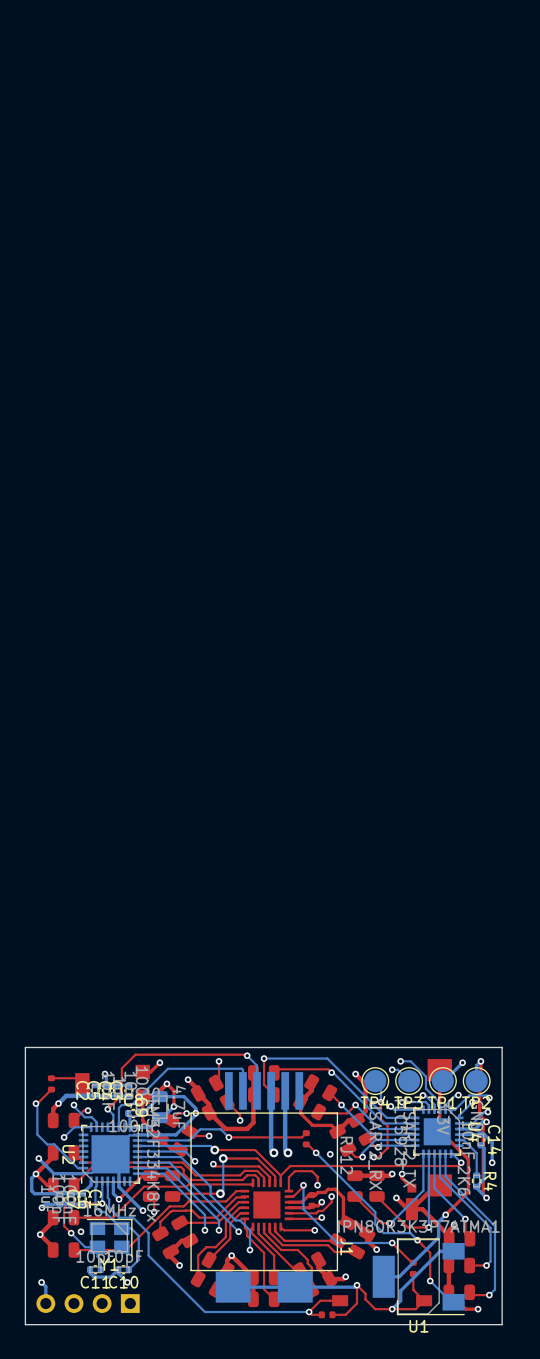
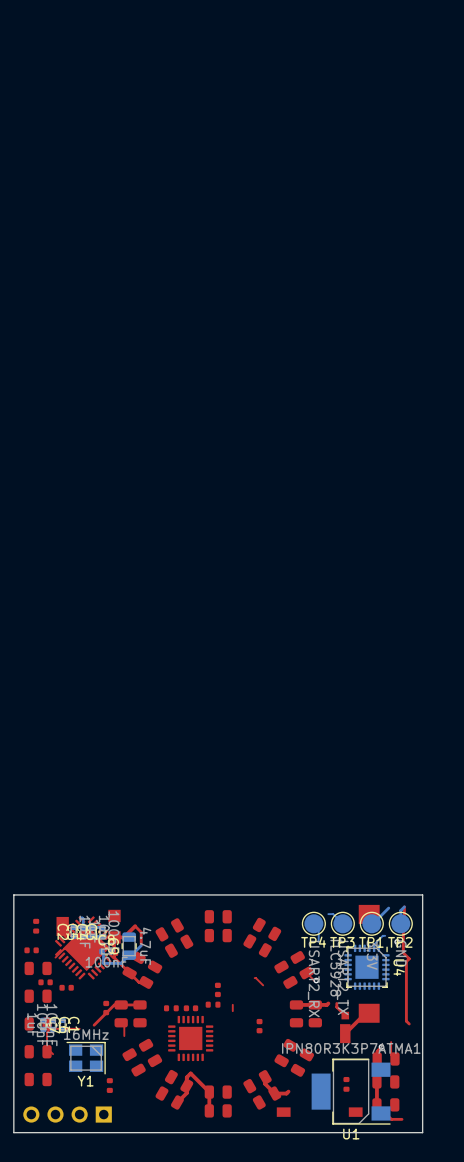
bottom track: (247, 1055) (257, 1065) (257, 1090) -> none
top track: (247, 1055) (135, 1054) (121, 1068) (121, 1095) (107, 1109) -> none
via: (247, 1055) -> none
bottom track: (264, 1058) (327, 1058) (386, 1117) (415, 1117) -> none
top track: (264, 1058) (264, 1084) (274, 1094) -> none
via: (264, 1058) -> none
top track: (219, 1061) (219, 1080) (216, 1083) -> none
via: (219, 1061) -> none
bottom track: (400, 1061) (410, 1061) (426, 1076) (426, 1088) (440, 1102) (440, 1109) -> none
via: (400, 1061) -> none
via: (480, 1061) -> none
top track: (159, 1062) (150, 1071) (142, 1071) -> none
via: (159, 1062) -> none
via: (462, 1062) -> none
via: (392, 1069) -> none
top track: (439, 1070) (439, 1130) (468, 1159) (468, 1192) (445, 1214) -> none
top track: (253, 1072) (253, 1122) (247, 1128) (225, 1128) (209, 1112) (209, 1104) (188, 1079) -> none
bottom track: (331, 1072) (383, 1123) (415, 1123) -> none
top track: (331, 1072) (328, 1069) (277, 1069) (274, 1072) -> none
via: (331, 1072) -> none
via: (104, 1074) -> none
top track: (355, 1074) (365, 1083) (365, 1111) (356, 1120) (348, 1120) (337, 1131) (331, 1125) (312, 1125) (300, 1113) (300, 1101) (311, 1090) (311, 1082) -> none
via: (355, 1074) -> none
top track: (51, 1078) (76, 1078) (82, 1084) -> none
via: (188, 1079) -> none
via: (166, 1083) -> none
top track: (51, 1089) (35, 1103) -> none
bottom track: (242, 1090) (241, 1068) (167, 1068) (131, 1105) (121, 1105) (118, 1107) (118, 1127) -> none
bottom track: (271, 1090) (271, 1150) (273, 1152) -> none
bottom track: (285, 1090) (285, 1150) (288, 1152) -> none
top track: (329, 1092) (341, 1105) -> none
bottom track: (106, 1095) (66, 1095) (58, 1103) -> none
bottom track: (422, 1095) (425, 1095) (434, 1104) (434, 1109) -> none
via: (422, 1095) -> none
via: (458, 1095) -> none
bottom track: (489, 1097) (486, 1095) (469, 1095) (455, 1109) (451, 1109) -> none
via: (489, 1097) -> none
top track: (227, 1102) (240, 1115) (240, 1120) -> none
top track: (380, 1102) (380, 1119) (387, 1125) (387, 1148) (378, 1157) (373, 1157) -> none
via: (380, 1102) -> none
bottom track: (402, 1102) (425, 1102) (428, 1105) (428, 1109) -> none
via: (402, 1102) -> none
bottom track: (472, 1102) (459, 1115) (459, 1117) -> none
bottom track: (35, 1103) (37, 1134) (47, 1144) (54, 1144) (77, 1168) (83, 1168) -> none
via: (35, 1103) -> none
top track: (58, 1103) (53, 1108) (53, 1120) -> none
via: (58, 1103) -> none
bottom track: (73, 1105) (84, 1117) (91, 1117) (96, 1122) (96, 1127) -> none
via: (73, 1105) -> none
bottom track: (341, 1105) (371, 1134) (415, 1134) -> none
via: (341, 1105) -> none
bottom track: (355, 1105) (379, 1128) (415, 1128) -> none
top track: (355, 1105) (347, 1113) (318, 1112) -> none
via: (355, 1105) -> none
via: (173, 1106) -> none
bottom track: (390, 1106) (394, 1109) (423, 1109) -> none
via: (390, 1106) -> none
bottom track: (107, 1109) (113, 1114) (113, 1127) -> none
via: (107, 1109) -> none
via: (88, 1110) -> none
part: none -> (31, 950)
bottom track: (487, 1112) (484, 1112) (473, 1123) (459, 1123) -> none
via: (487, 1112) -> none
bottom track: (138, 1113) (143, 1113) (159, 1096) (183, 1096) (195, 1108) (195, 1114) (175, 1134) (129, 1135) (92, 1172) (53, 1173) (38, 1158) -> none
top track: (186, 1113) (177, 1113) (170, 1120) -> none
via: (186, 1113) -> none
via: (195, 1113) -> none
part position: (63, 1120) -> (38, 968)
via: (240, 1120) -> none
bottom track: (486, 1121) (482, 1121) (475, 1128) (459, 1128) -> none
via: (486, 1121) -> none
bottom track: (91, 1127) (74, 1127) (64, 1137) -> none
top track: (190, 1131) (194, 1135) (209, 1135) -> none
top track: (306, 1133) (302, 1137) (228, 1137) -> none
bottom track: (459, 1134) (484, 1134) (492, 1142) (492, 1162) -> none
via: (209, 1135) -> none
via: (64, 1137) -> none
bottom track: (228, 1137) (220, 1129) (200, 1129) (189, 1140) (137, 1140) -> none
via: (228, 1137) -> none
part rotation: 0° (306, 1138) -> 90° clockwise (171, 1008)
part position: (306, 1138) -> (171, 1008)
C14 side: bottom (480, 1139) -> top (217, 989)
bottom track: (415, 1140) (375, 1140) (362, 1152) (362, 1157) -> none
bottom track: (459, 1140) (463, 1140) (476, 1153) (476, 1175) -> none
part footprint: [47, 1145, 80, 1161] -> [38, 979, 53, 986]
bottom track: (137, 1145) (210, 1145) (214, 1150) -> none
bottom track: (415, 1145) (379, 1145) (378, 1147) -> none
bottom track: (480, 1145) (484, 1148) (484, 1179) (476, 1188) (486, 1197) -> none
top track: (348, 1149) (355, 1157) (362, 1157) -> none
top track: (214, 1150) (255, 1150) (280, 1175) (290, 1166) (457, 1166) (461, 1162) -> none
via: (214, 1150) -> none
bottom track: (137, 1151) (185, 1151) (195, 1161) -> none
top track: (53, 1152) (53, 1156) (35, 1174) (47, 1185) (53, 1185) -> none
top track: (73, 1152) (83, 1162) (182, 1162) (195, 1175) (240, 1175) (244, 1170) (257, 1170) (264, 1177) (264, 1182) -> none
via: (273, 1152) -> none
via: (288, 1152) -> none
bottom track: (316, 1152) (375, 1212) (375, 1224) (383, 1233) (410, 1233) (417, 1240) -> none
via: (316, 1152) -> none
bottom track: (423, 1153) (423, 1190) (389, 1223) -> none
bottom track: (428, 1153) (428, 1227) -> none
bottom track: (434, 1153) (434, 1188) (465, 1219) -> none
bottom track: (440, 1153) (440, 1177) (490, 1227) (490, 1261) (486, 1265) -> none
bottom track: (445, 1153) (445, 1176) (494, 1226) (494, 1289) (489, 1295) -> none
bottom track: (451, 1153) (461, 1162) -> none
bottom track: (110, 1154) (118, 1162) (118, 1187) (142, 1210) -> none
U2 side: bottom (110, 1154) -> top (86, 947)
via: (330, 1154) -> none
bottom track: (137, 1157) (180, 1157) (210, 1186) (210, 1195) (235, 1220) (240, 1220) (249, 1230) (249, 1250) -> none
via: (362, 1157) -> none
via: (373, 1157) -> none
via: (38, 1158) -> none
bottom track: (223, 1158) (223, 1190) (220, 1193) -> none
top track: (223, 1158) (257, 1158) (275, 1176) (275, 1182) -> none
via: (223, 1158) -> none
via: (195, 1161) -> none
bottom track: (137, 1162) (169, 1162) (238, 1231) -> none
via: (461, 1162) -> none
via: (492, 1162) -> none
top track: (213, 1164) (215, 1166) (259, 1166) (269, 1177) (269, 1182) -> none
via: (213, 1164) -> none
part: none -> (38, 996)
bottom track: (137, 1168) (166, 1168) (219, 1220) (219, 1230) -> none
bottom track: (137, 1173) (163, 1173) (204, 1214) (204, 1230) -> none
bottom track: (35, 1174) (31, 1178) (31, 1190) (34, 1193) (82, 1193) (91, 1184) (91, 1181) -> none
via: (35, 1174) -> none
via: (392, 1174) -> none
via: (402, 1174) -> none
bottom track: (96, 1181) (95, 1206) (100, 1212) (104, 1212) (121, 1228) (131, 1228) (138, 1235) (138, 1259) (128, 1269) -> none
bottom track: (102, 1181) (102, 1203) -> none
bottom track: (107, 1181) (109, 1207) (119, 1217) (133, 1217) (148, 1233) (148, 1255) (204, 1311) (309, 1311) -> none
bottom track: (113, 1181) (113, 1193) (119, 1199) -> none
R4 side: bottom (476, 1181) -> top (213, 1004)
top track: (253, 1182) (144, 1186) (113, 1217) (73, 1217) -> none
top track: (258, 1182) (258, 1178) (255, 1175) (247, 1175) (242, 1180) (189, 1180) (183, 1173) (183, 1169) (181, 1167) (92, 1167) (73, 1185) -> none
part: (63, 1185) -> none
bottom track: (303, 1185) (303, 1209) (337, 1242) (392, 1242) -> none
top track: (303, 1185) (293, 1196) (288, 1196) -> none
via: (303, 1185) -> none
top track: (317, 1185) (317, 1176) (311, 1171) (295, 1171) (288, 1177) (288, 1191) -> none
via: (317, 1185) -> none
J1: RJ12 (264, 1187) -> none
top track: (244, 1191) (236, 1191) (226, 1201) (188, 1201) (183, 1206) (169, 1206) (126, 1250) (73, 1250) -> none
top track: (220, 1193) (175, 1193) (172, 1196) -> none
via: (220, 1193) -> none
top track: (244, 1196) (236, 1197) (216, 1217) (199, 1217) (192, 1210) (172, 1210) (160, 1221) (160, 1233) -> none
top track: (331, 1196) (331, 1202) (322, 1210) (316, 1213) (288, 1213) -> none
via: (331, 1196) -> none
top track: (355, 1196) (381, 1223) (389, 1223) -> none
top track: (377, 1196) (408, 1227) (428, 1227) -> none
part: none -> (38, 1023)
top track: (396, 1197) (407, 1209) (422, 1209) (449, 1235) (449, 1238) -> none
via: (396, 1197) -> none
via: (486, 1197) -> none
via: (119, 1199) -> none
top track: (244, 1202) (238, 1202) (218, 1222) (179, 1222) -> none
top track: (288, 1202) (302, 1202) (309, 1195) (325, 1192) (328, 1189) (335, 1189) (343, 1197) (343, 1218) (348, 1222) (355, 1222) (367, 1234) (367, 1240) (376, 1249) -> none
top track: (321, 1202) (318, 1205) (309, 1207) (288, 1207) -> none
via: (321, 1202) -> none
via: (102, 1203) -> none
bottom track: (82, 1204) (45, 1204) (41, 1207) -> none
part position: (266, 1204) -> (190, 1038)
via: (41, 1207) -> none
top track: (244, 1207) (239, 1207) (225, 1221) (225, 1236) (215, 1247) (206, 1247) (198, 1255) (198, 1279) -> none
via: (142, 1210) -> none
via: (154, 1212) -> none
top track: (244, 1213) (240, 1213) (230, 1223) (230, 1238) (209, 1259) -> none
bottom track: (445, 1214) (438, 1221) (438, 1237) (399, 1276) (383, 1276) -> none
via: (445, 1214) -> none
top track: (53, 1217) (53, 1221) (40, 1234) (53, 1247) (53, 1250) -> none
part: (63, 1217) -> none
top track: (321, 1217) (288, 1218) -> none
via: (321, 1217) -> none
top track: (244, 1218) (247, 1235) (264, 1252) (264, 1289) (274, 1299) -> none
via: (465, 1219) -> none
via: (389, 1223) -> none
top track: (253, 1227) (251, 1232) (274, 1255) (274, 1277) -> none
top track: (258, 1227) (258, 1233) (295, 1270) (300, 1270) -> none
top track: (264, 1227) (264, 1232) (281, 1250) (297, 1250) (307, 1259) (307, 1263) (311, 1267) (311, 1289) -> none
top track: (269, 1227) (269, 1232) (282, 1245) (328, 1245) (334, 1252) (356, 1252) -> none
top track: (275, 1227) (275, 1231) (284, 1240) (337, 1240) -> none
top track: (280, 1227) (284, 1230) (314, 1230) -> none
via: (428, 1227) -> none
part: none -> (38, 1051)
via: (204, 1230) -> none
via: (219, 1230) -> none
via: (314, 1230) -> none
via: (81, 1231) -> none
via: (238, 1231) -> none
bottom track: (71, 1233) (85, 1247) (97, 1247) (100, 1269) -> none
via: (71, 1233) -> none
via: (40, 1234) -> none
top track: (189, 1240) (181, 1240) (170, 1251) (170, 1256) (179, 1265) -> none
top track: (417, 1240) (430, 1252) (430, 1281) -> none
via: (417, 1240) -> none
top track: (392, 1242) (413, 1262) -> none
via: (392, 1242) -> none
via: (376, 1249) -> none
part: (63, 1250) -> none
via: (249, 1250) -> none
bottom track: (453, 1251) (440, 1251) (400, 1290) (400, 1300) (392, 1309) -> none
via: (231, 1255) -> none
part: none -> (38, 1079)
via: (179, 1265) -> none
top track: (486, 1265) (469, 1265) -> none
via: (486, 1265) -> none
bottom track: (90, 1269) (90, 1273) (93, 1277) (110, 1277) (118, 1269) (118, 1273) (127, 1282) -> none
C11 side: bottom (95, 1269) -> top (66, 987)
C10 side: bottom (123, 1269) -> top (106, 1008)
part: none -> (109, 1085)
top track: (413, 1274) (413, 1289) (424, 1300) (415, 1309) (375, 1309) (365, 1299) (365, 1293) (357, 1285) (357, 1303) (345, 1314) (332, 1314) -> none
via: (345, 1276) -> none
bottom track: (430, 1281) (453, 1302) -> none
via: (430, 1281) -> none
bottom track: (41, 1282) (45, 1286) (45, 1303) -> none
via: (41, 1282) -> none
via: (127, 1282) -> none
bottom track: (357, 1285) (355, 1287) (233, 1287) -> none
via: (357, 1285) -> none
top track: (469, 1292) (472, 1295) (489, 1295) -> none
via: (489, 1295) -> none
top track: (340, 1300) (320, 1300) (309, 1311) (311, 1314) (321, 1314) -> none
via: (392, 1309) -> none
via: (478, 1309) -> none
via: (309, 1311) -> none
part position: (327, 1314) -> (190, 1008)

